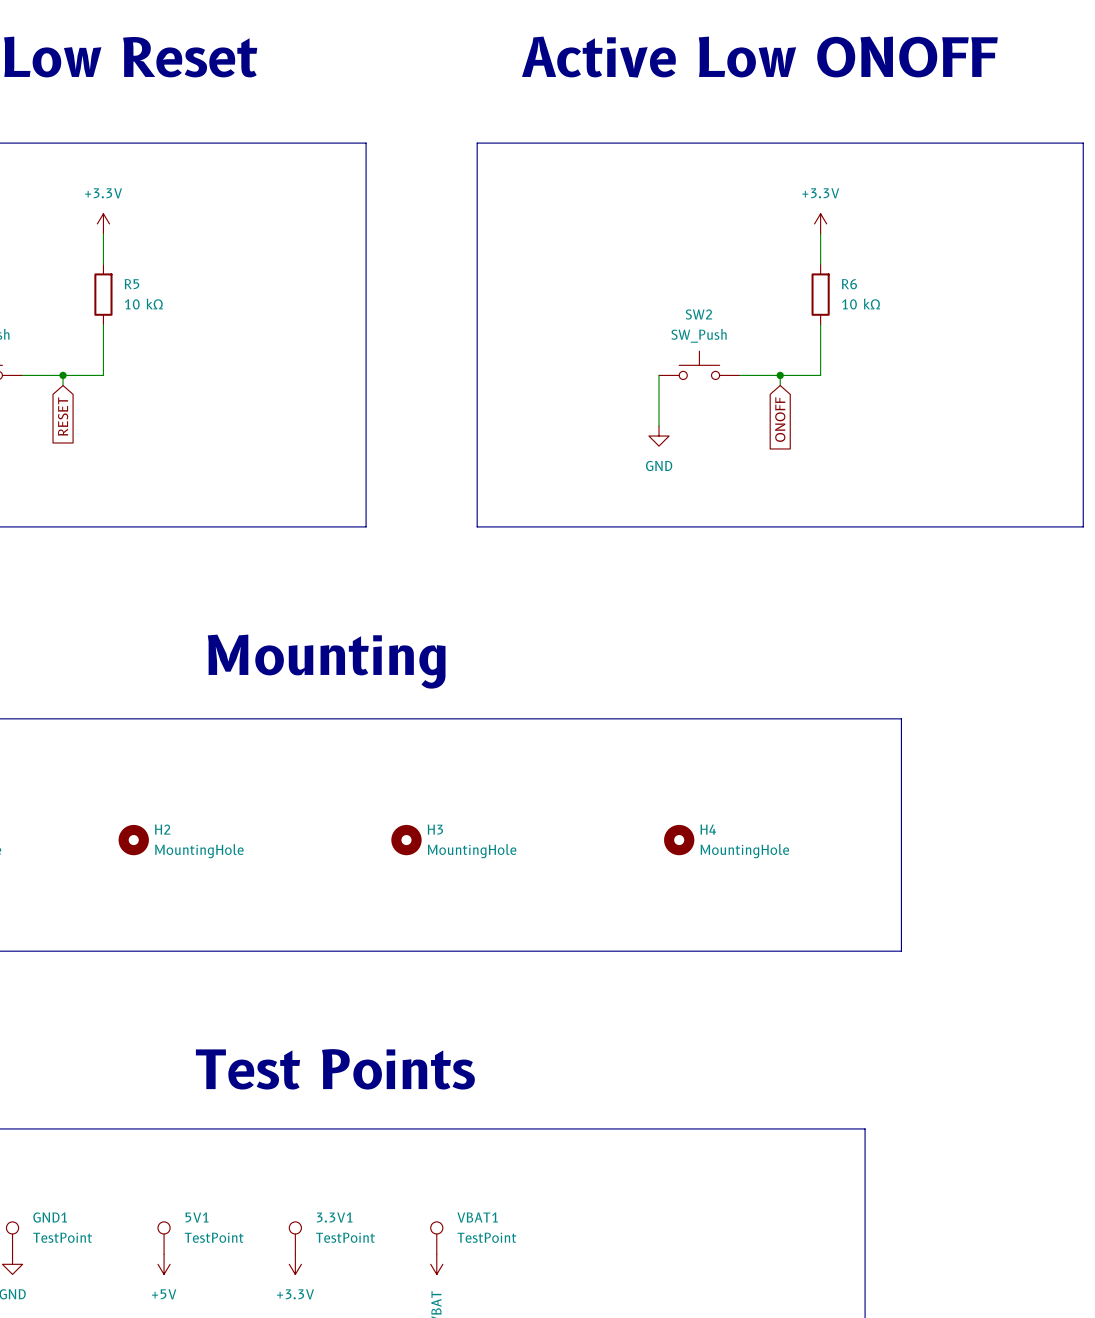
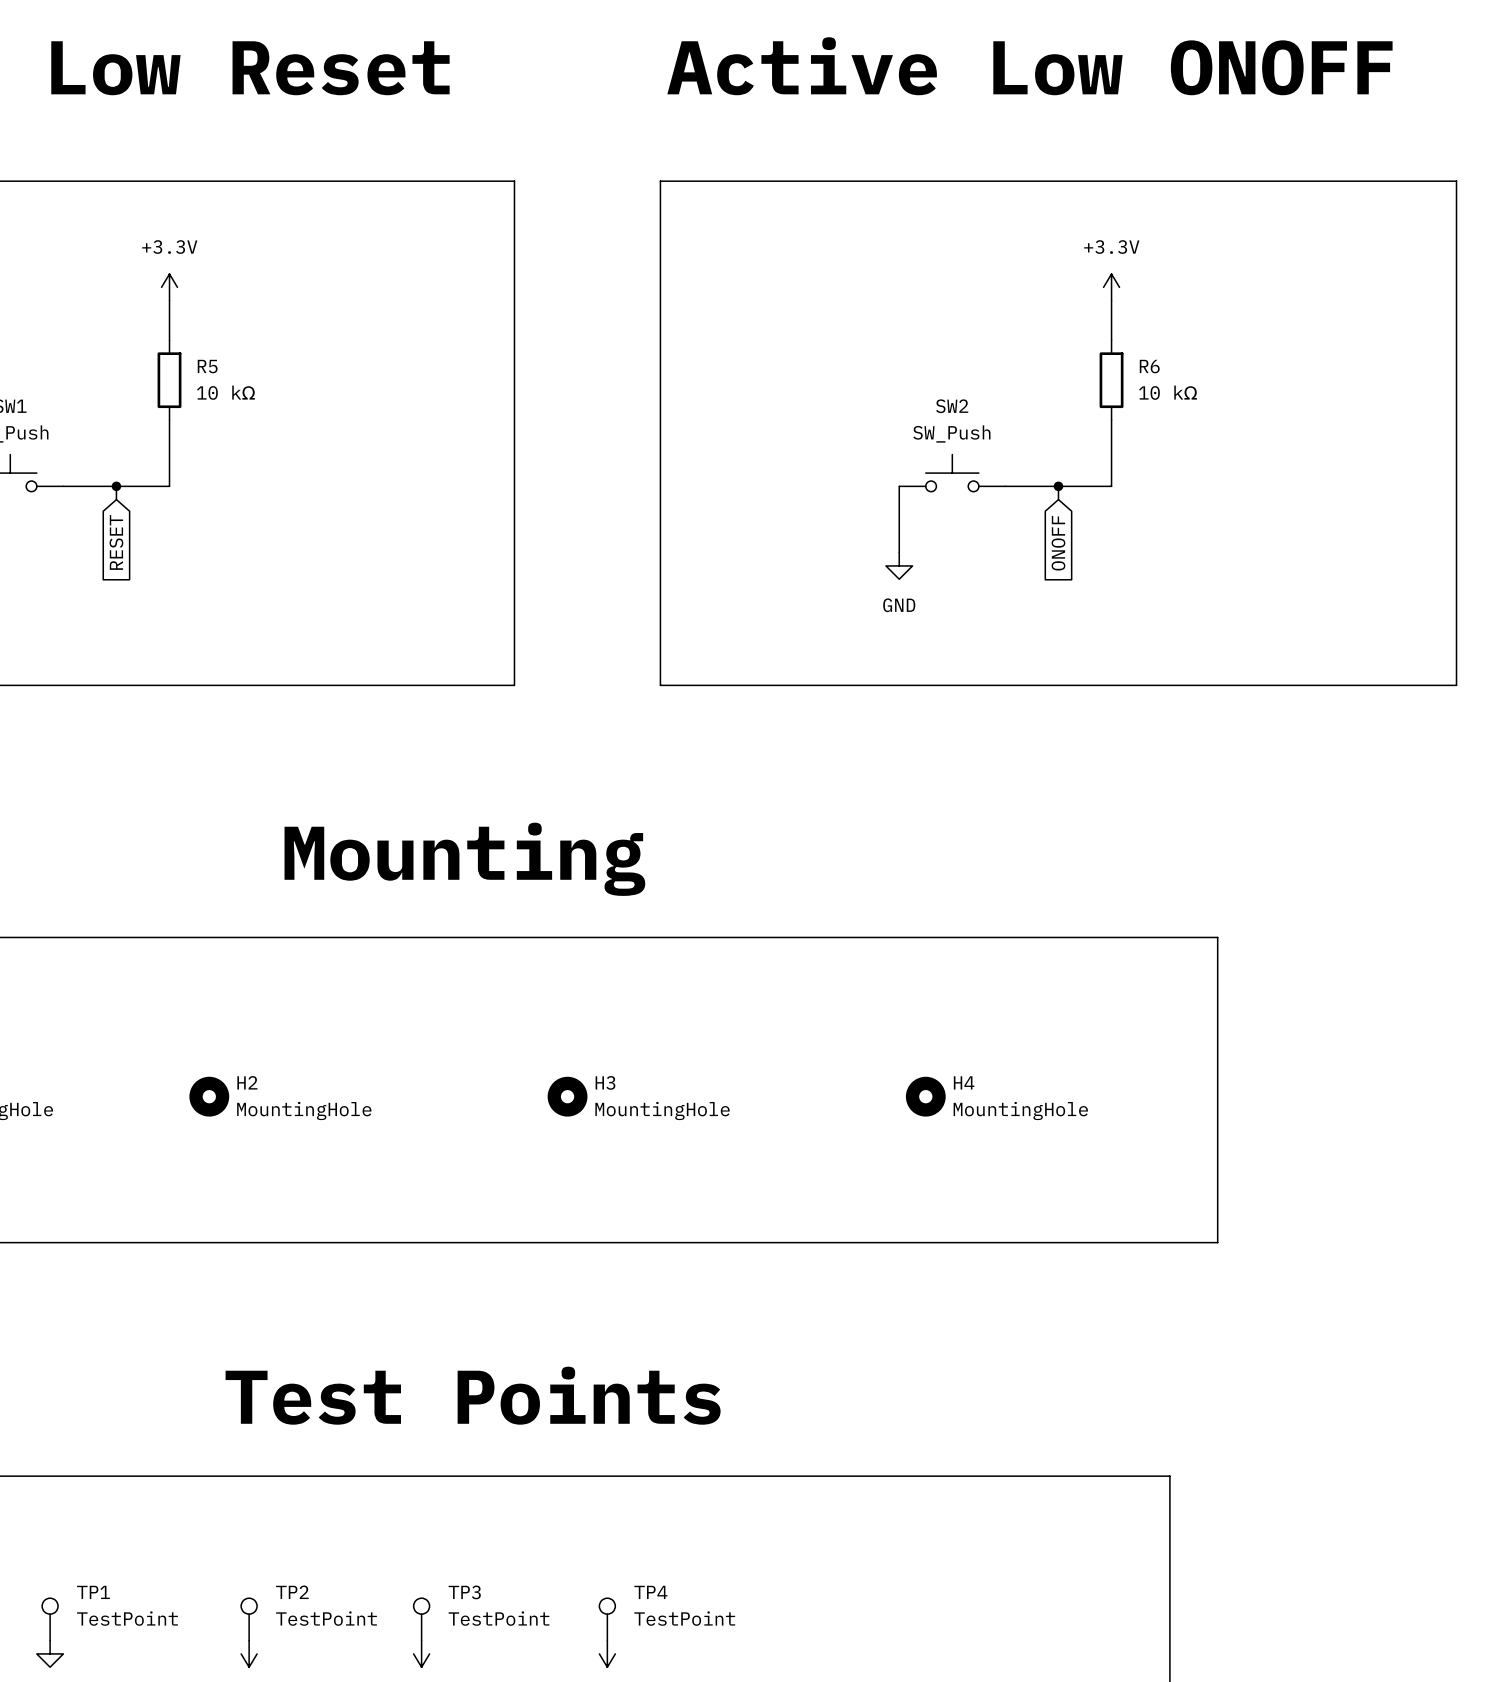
GND1 name: GND1 (50, 1217) -> TP1 (93, 1592)
5V1 name: 5V1 (197, 1217) -> TP2 (292, 1592)
3.3V1 name: 3.3V1 (334, 1217) -> TP3 (464, 1592)
VBAT1 name: VBAT1 (477, 1217) -> TP4 (650, 1592)

